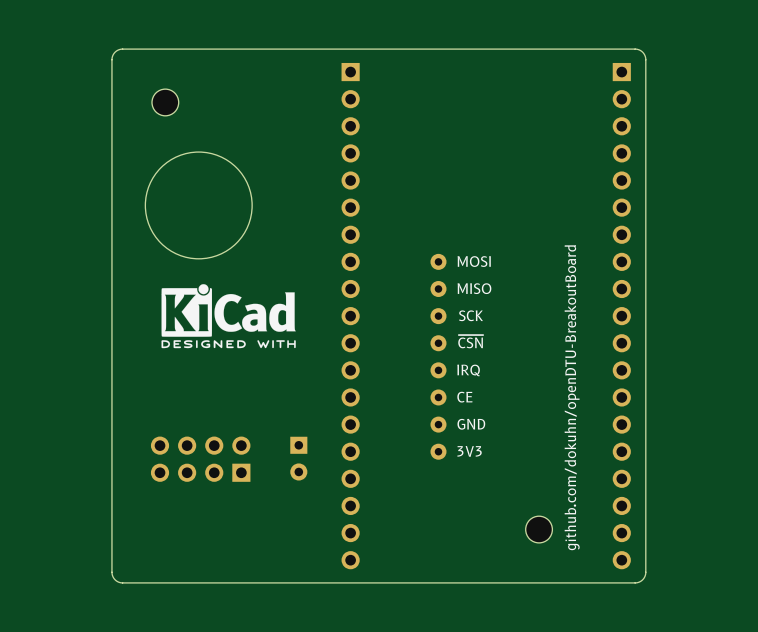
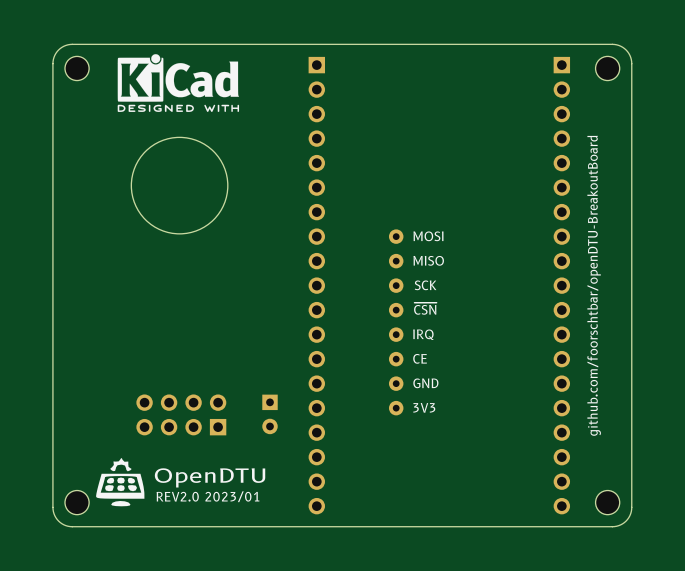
board edge: (122, 49) (115, 52) (111, 59) (111, 572) (115, 579) (122, 582) -> (110, 44) (65, 45) (55, 53) (52, 63) (53, 509) (57, 519) (65, 525) (110, 526)
board edge: (635, 49) (642, 52) (645, 59) (645, 572) (642, 579) (635, 582) -> (573, 44) (618, 45) (627, 51) (631, 63) (631, 509) (627, 519) (618, 525) (573, 526)
part: none -> (607, 68)
part position: (165, 102) -> (77, 68)
drawing position: (228, 316) -> (178, 83)
text: none -> github.com/foorschtbar/openDTU-BreakoutBoard (594, 285)
text: github.com/dokuhn/openDTU-BreakoutBoard (572, 397) -> none
drawing: none -> [96, 457, 145, 507]
text: none -> OpenDTU (210, 477)
part position: (539, 529) -> (607, 502)
text: none -> REV2.0 2023/01 (207, 496)
part: none -> (77, 502)

